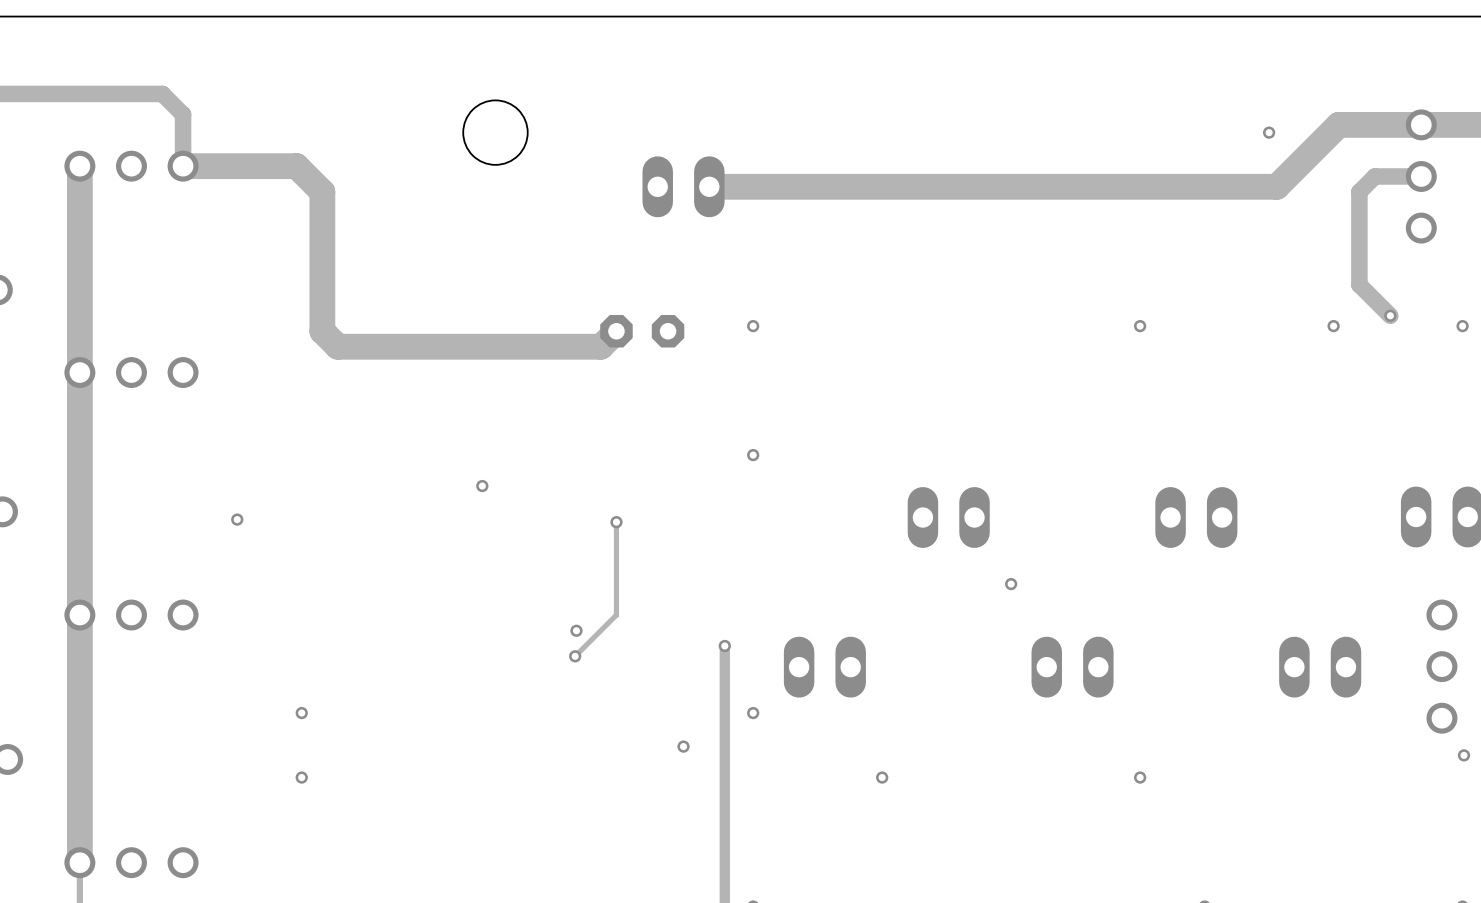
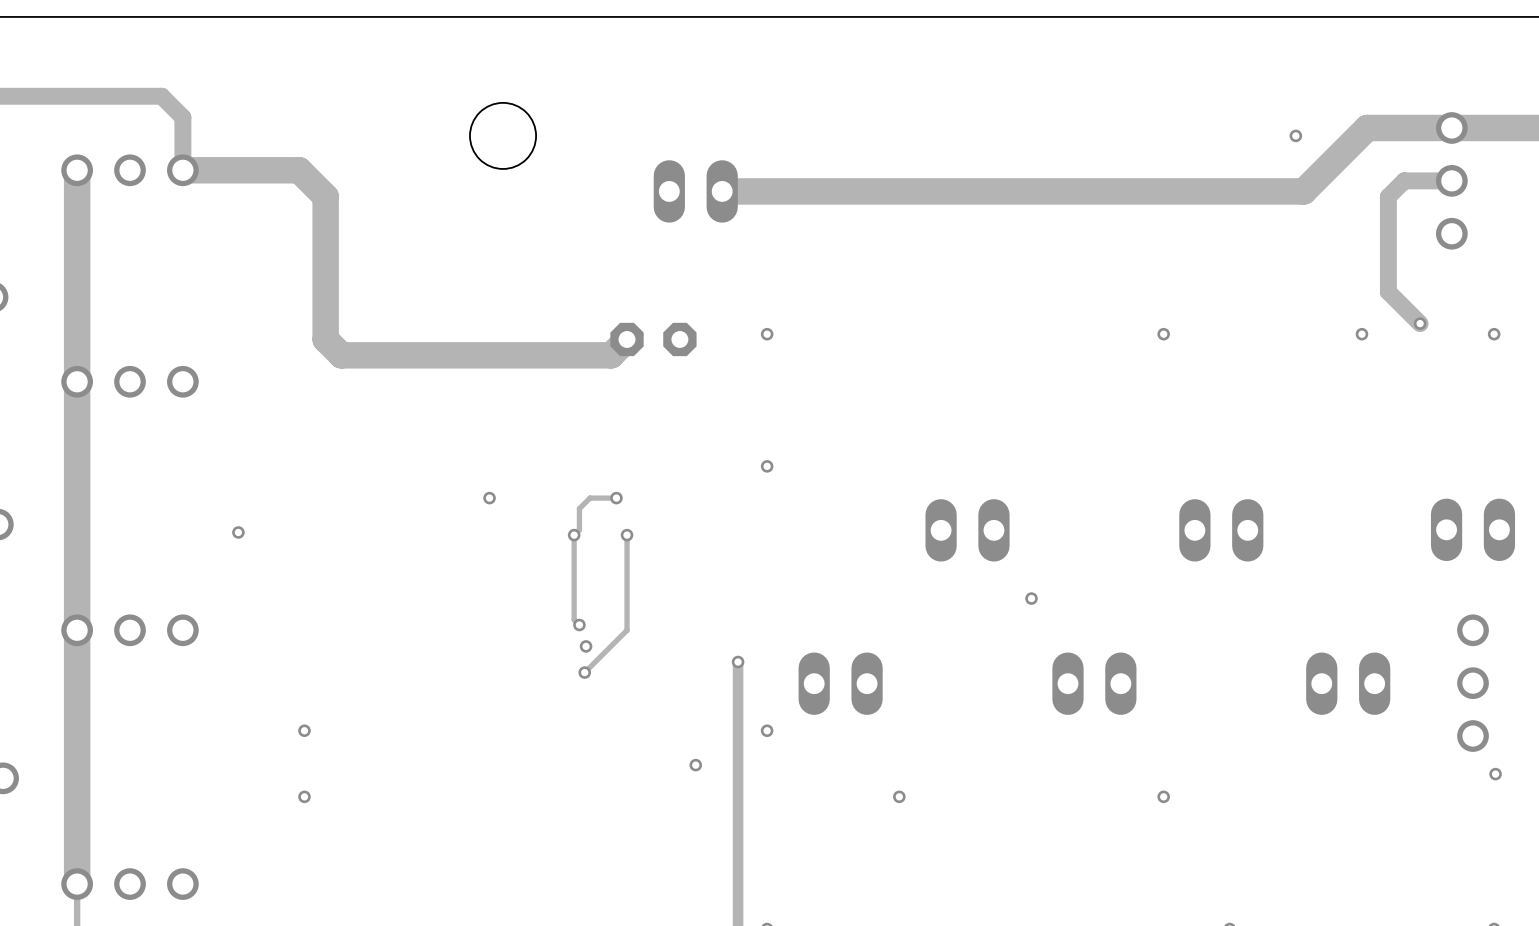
track: none -> (616, 498) (590, 498) (579, 508) (579, 529) (574, 535) (574, 619) (579, 625)
via: none -> (616, 498)
via: none -> (574, 535)
via: none -> (579, 625)

